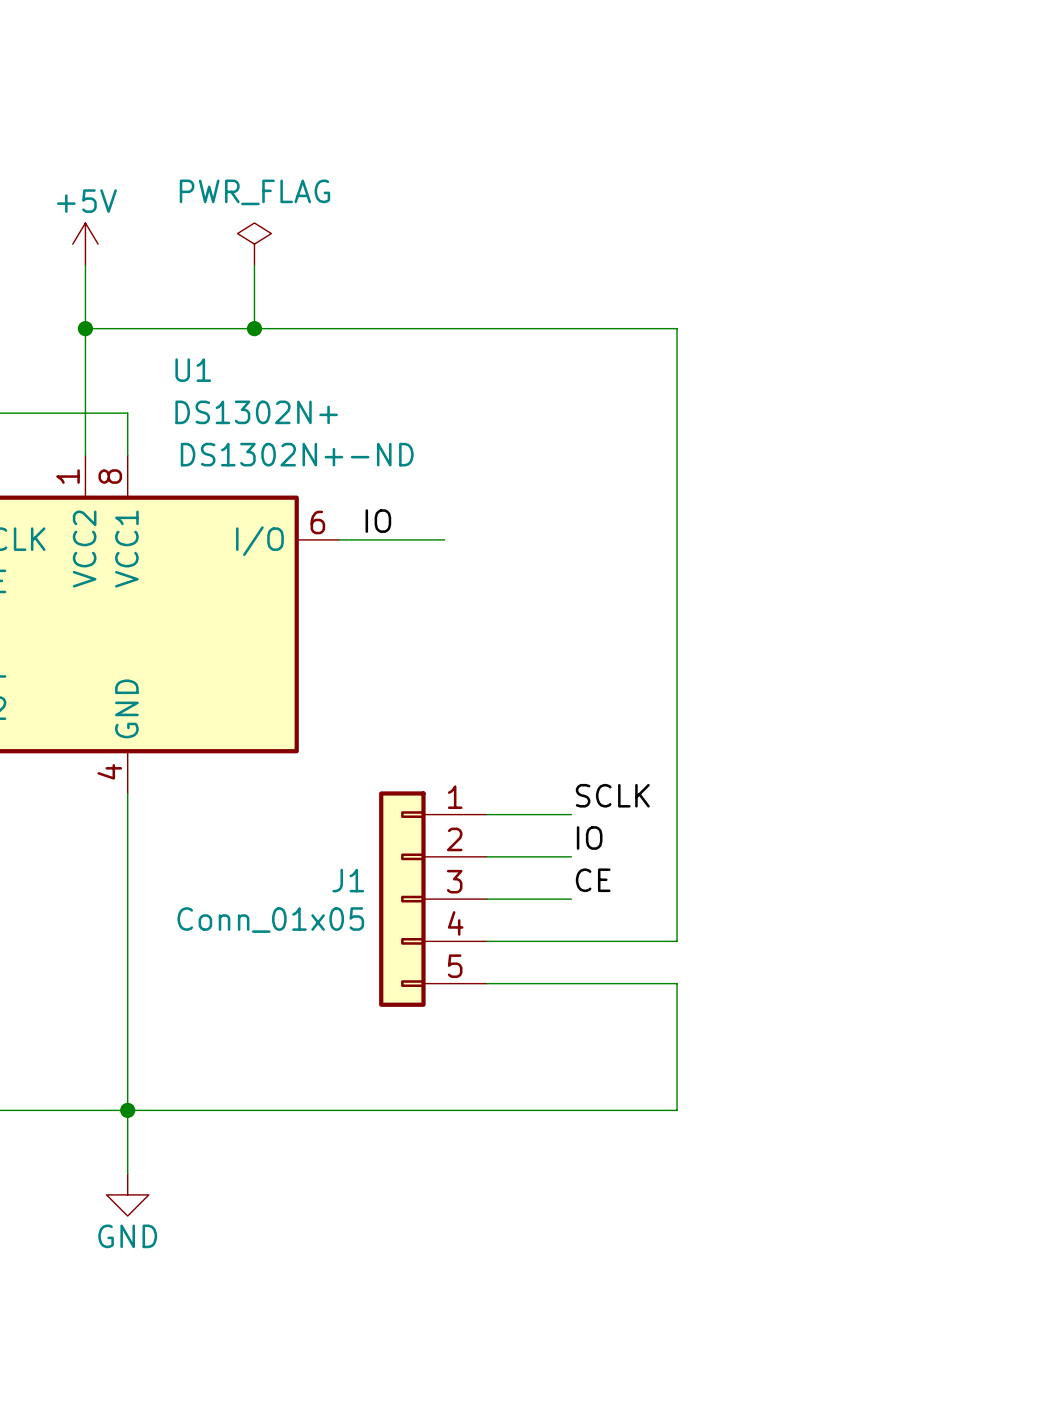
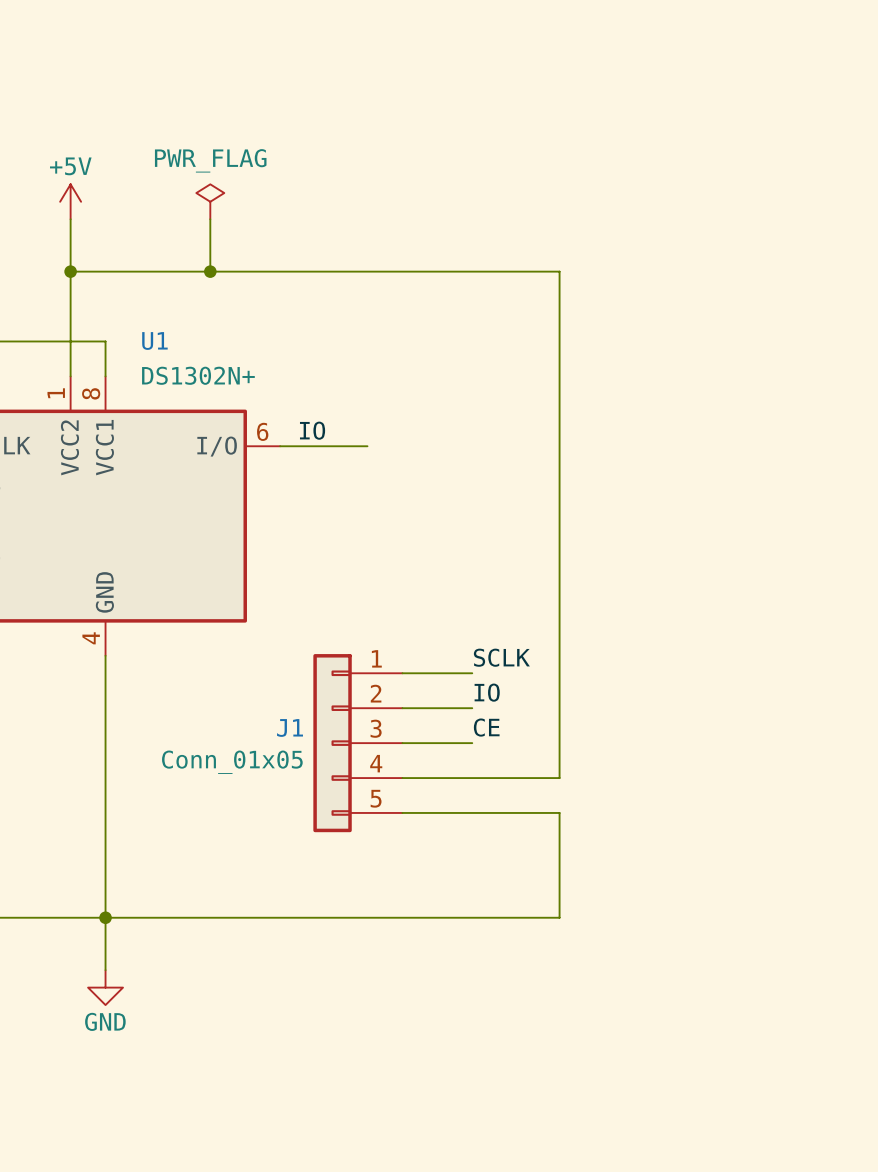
U1 name position: U1 (193, 370) -> U1 (154, 341)
U1 value position: DS1302N+ (256, 412) -> DS1302N+ (198, 375)
U1 text: DS1302N+-ND (297, 454) -> none

